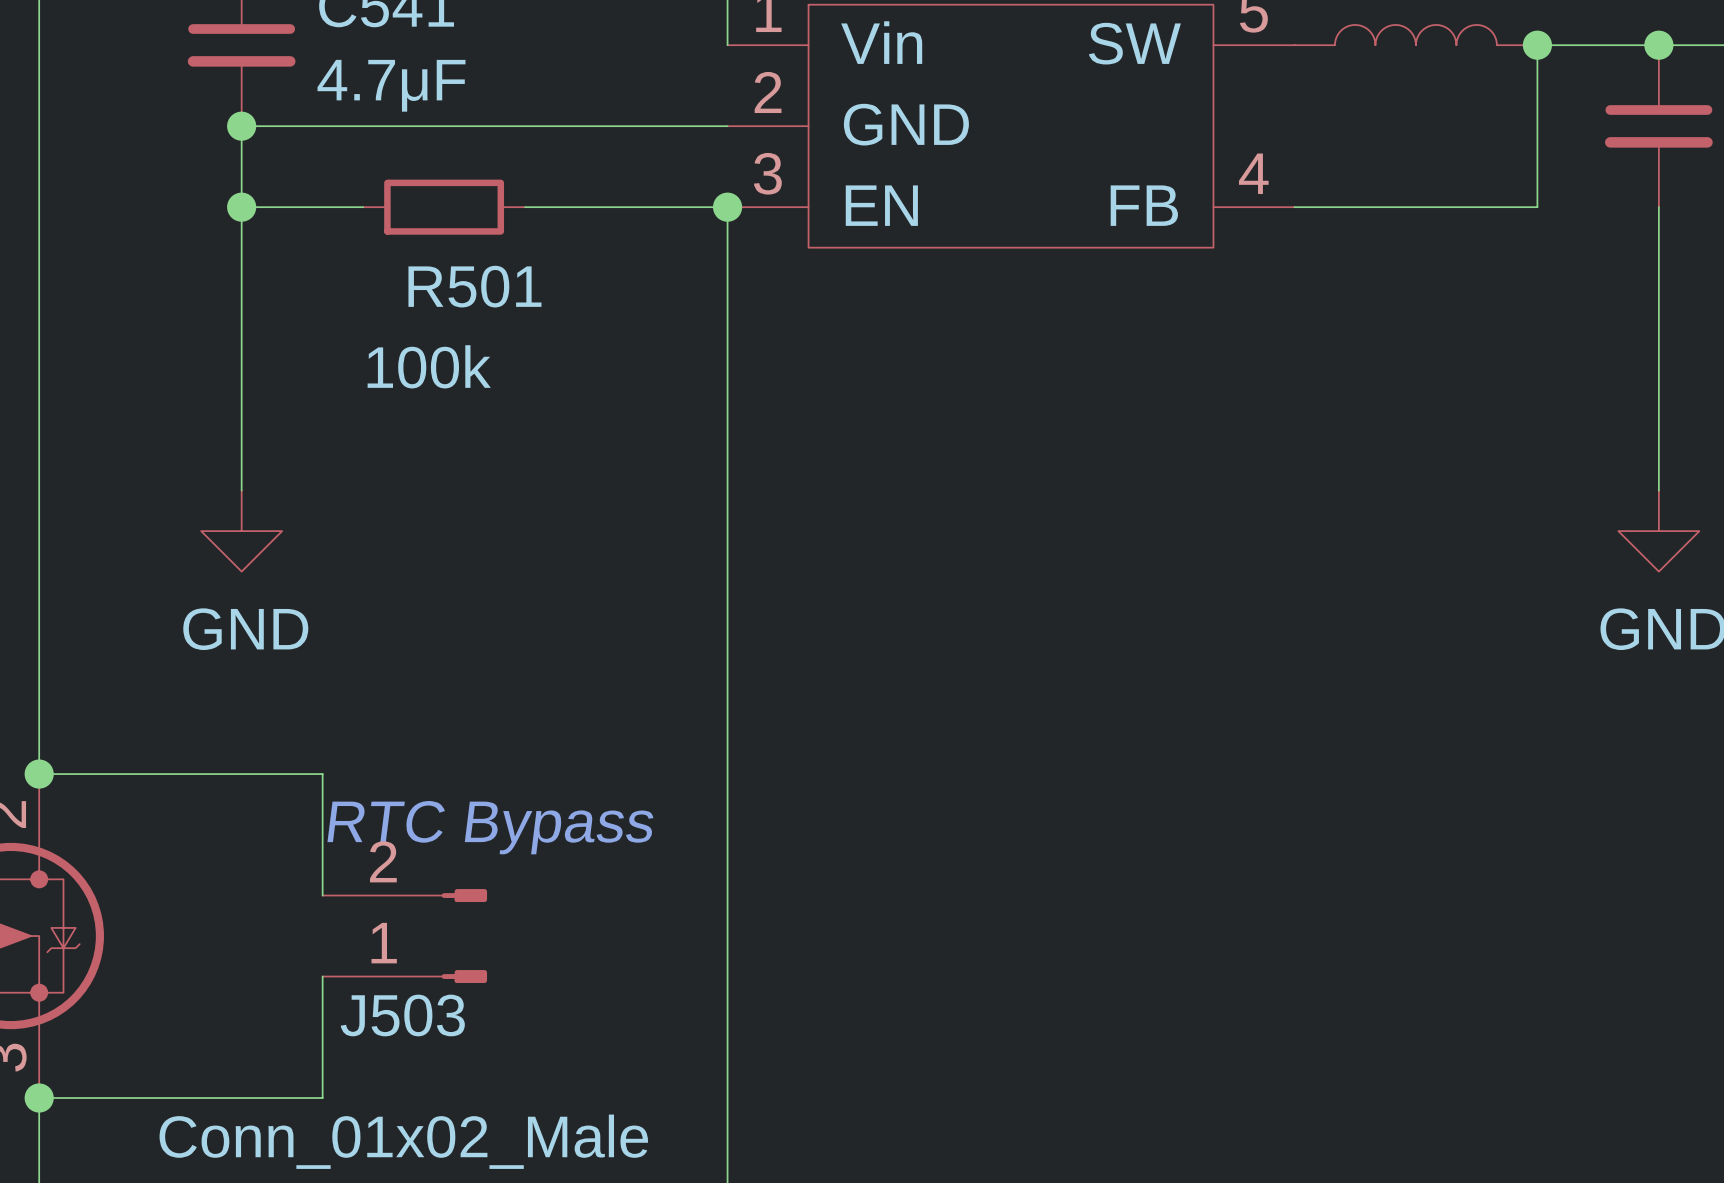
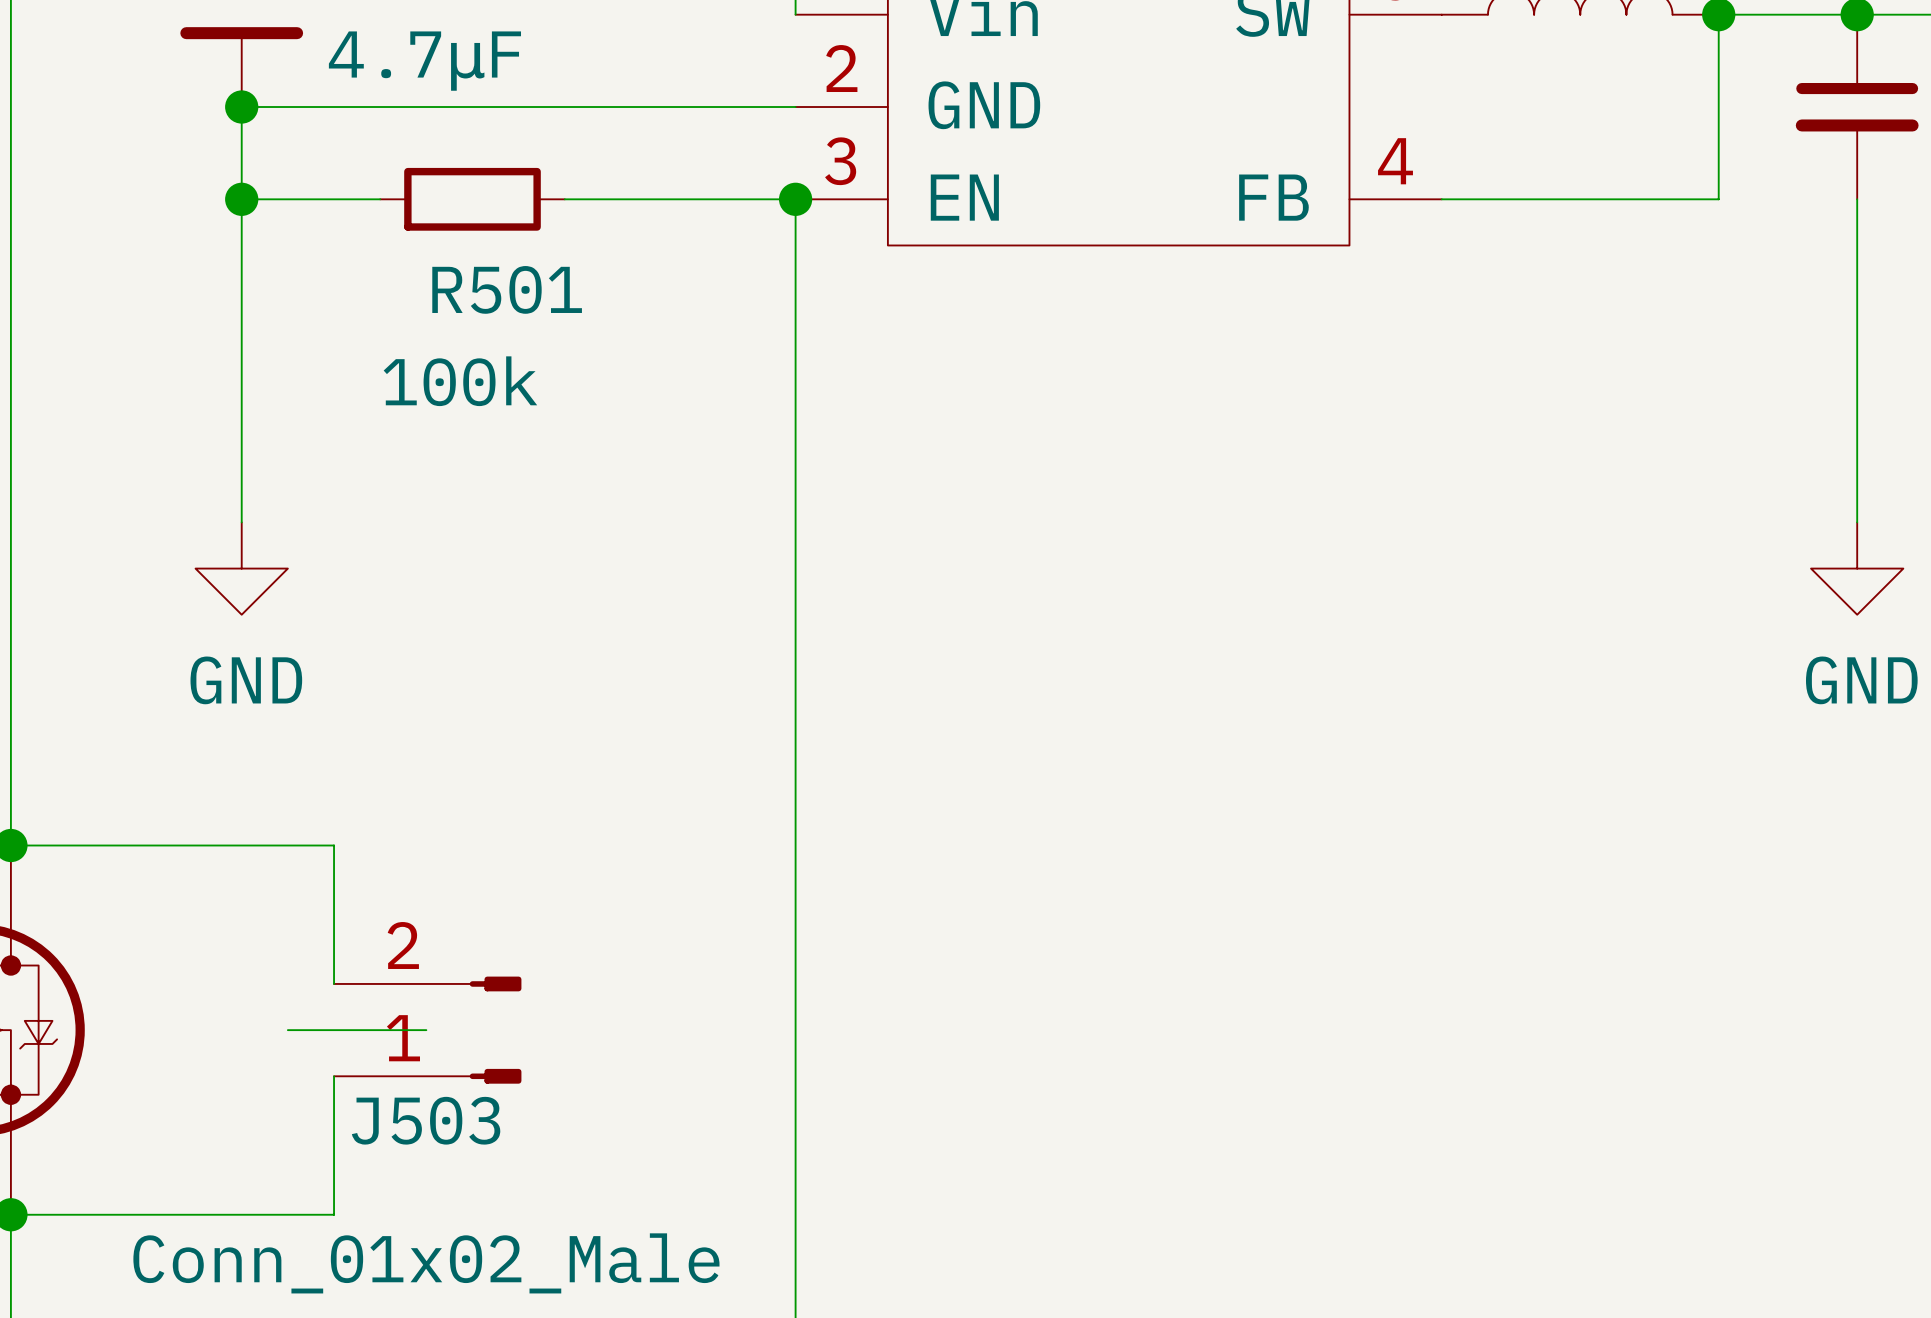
text: RTC Bypass (490, 827) -> none
wire: none -> (287, 1030) (426, 1030)

